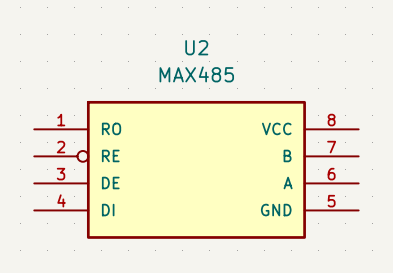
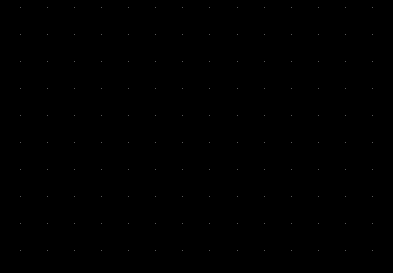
U2: MAX485 (196, 169) -> none

